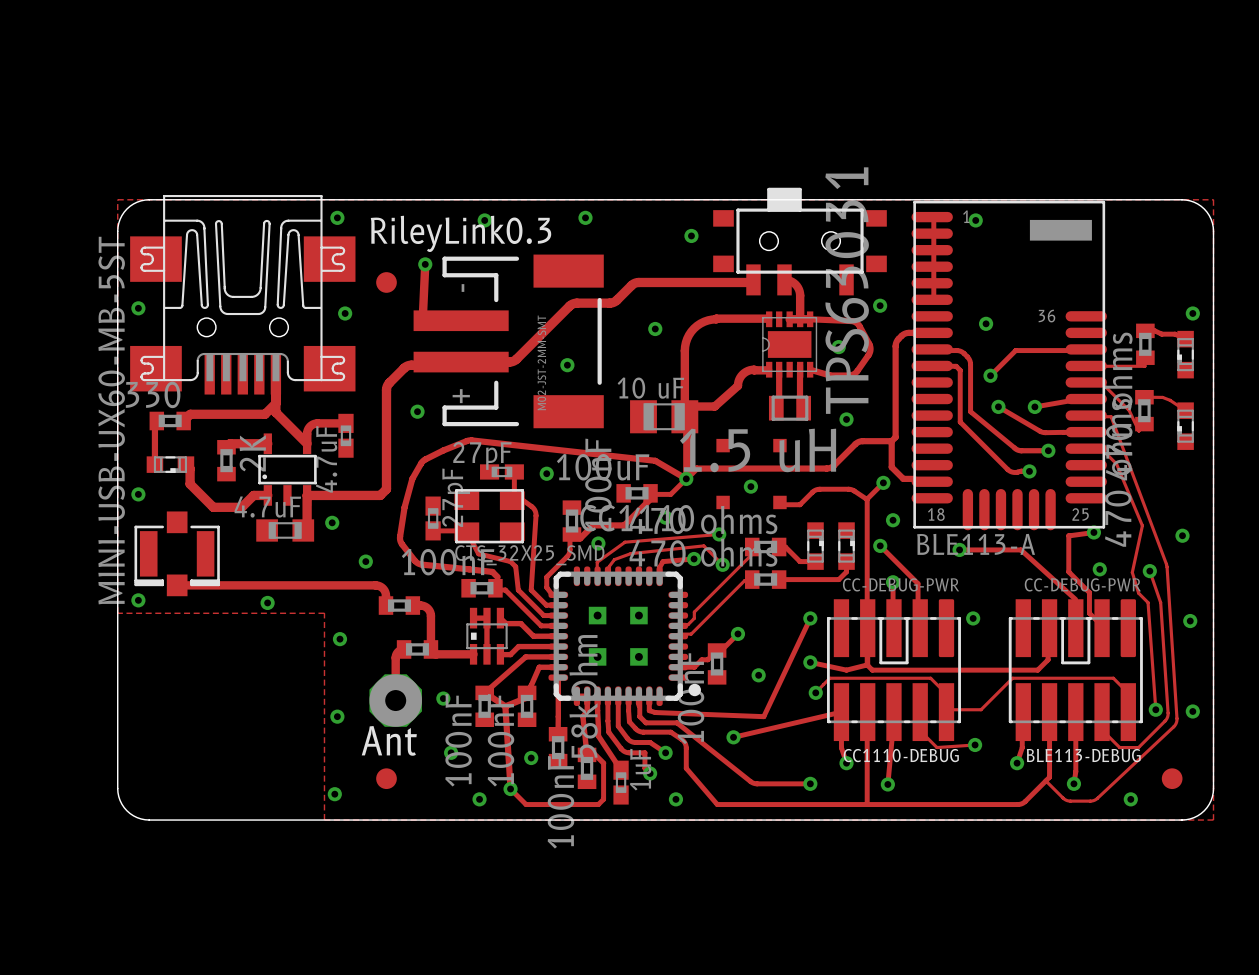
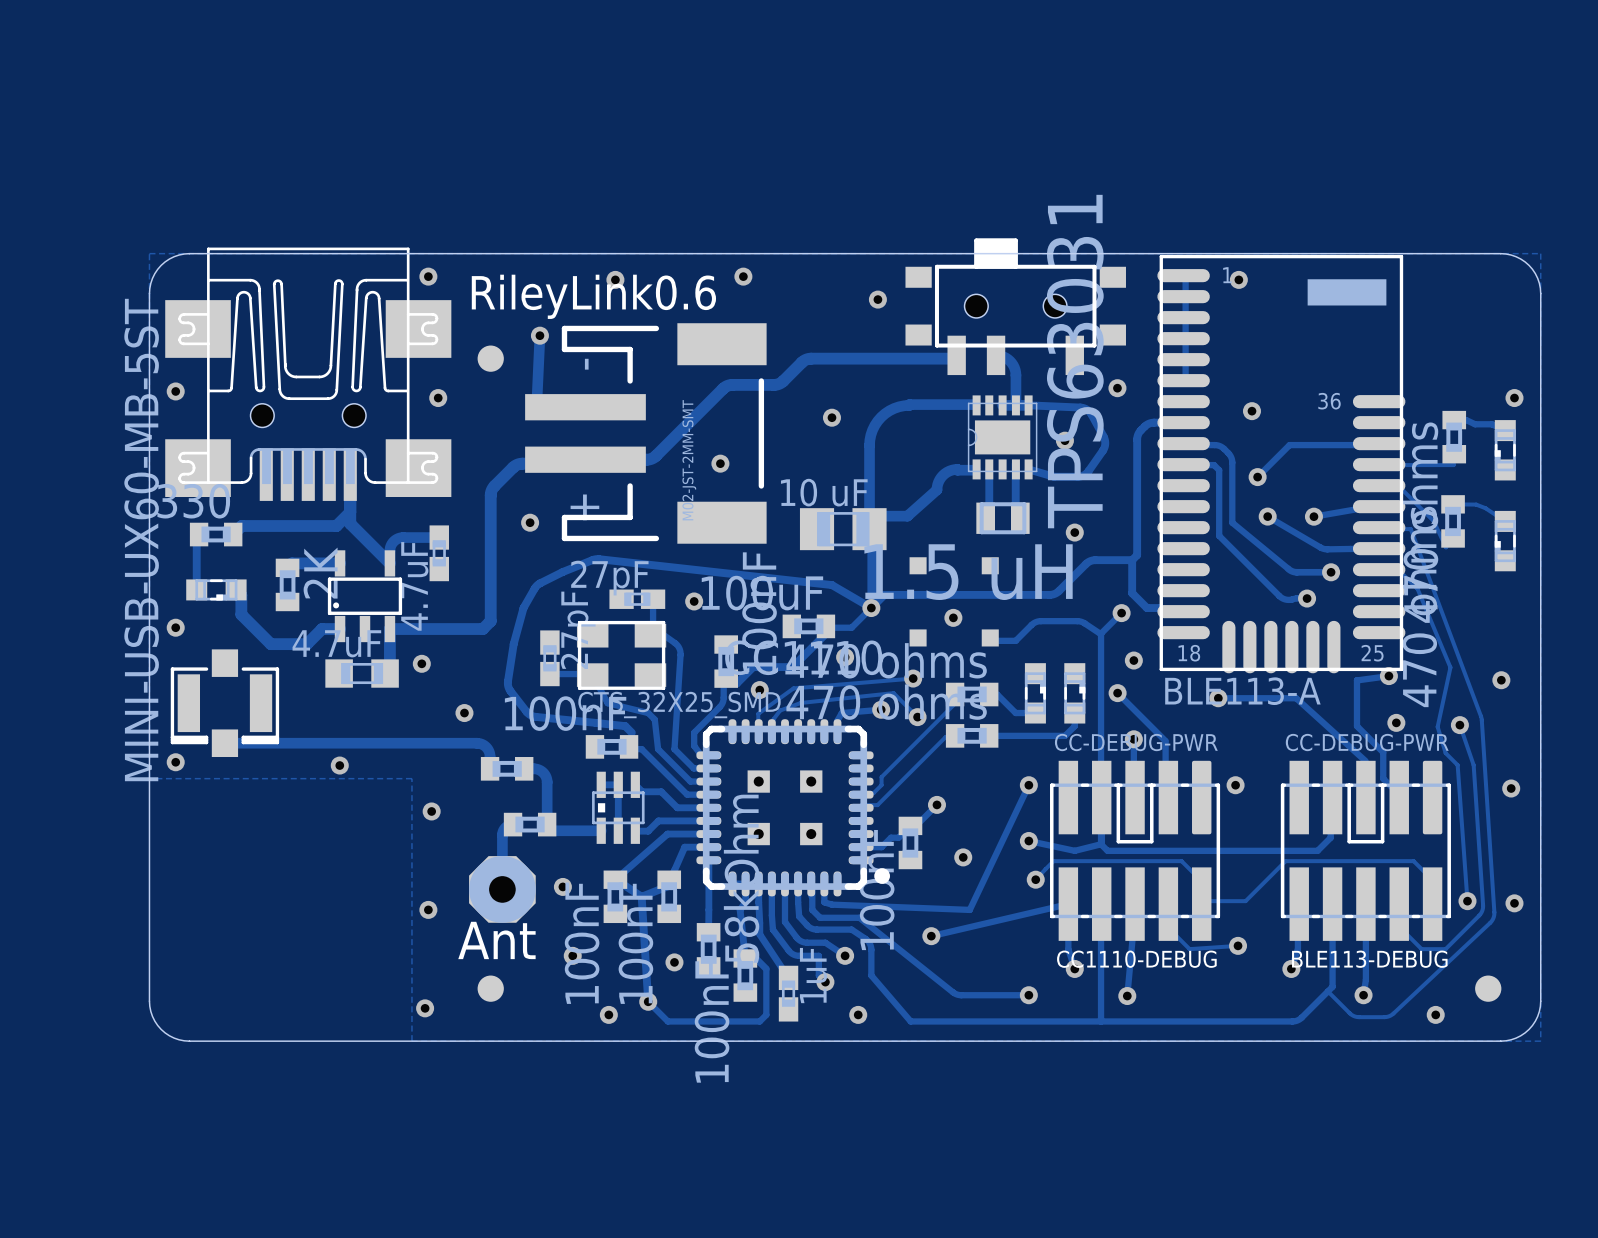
text: RileyLink0.3 (461, 233) -> RileyLink0.6 (593, 296)

